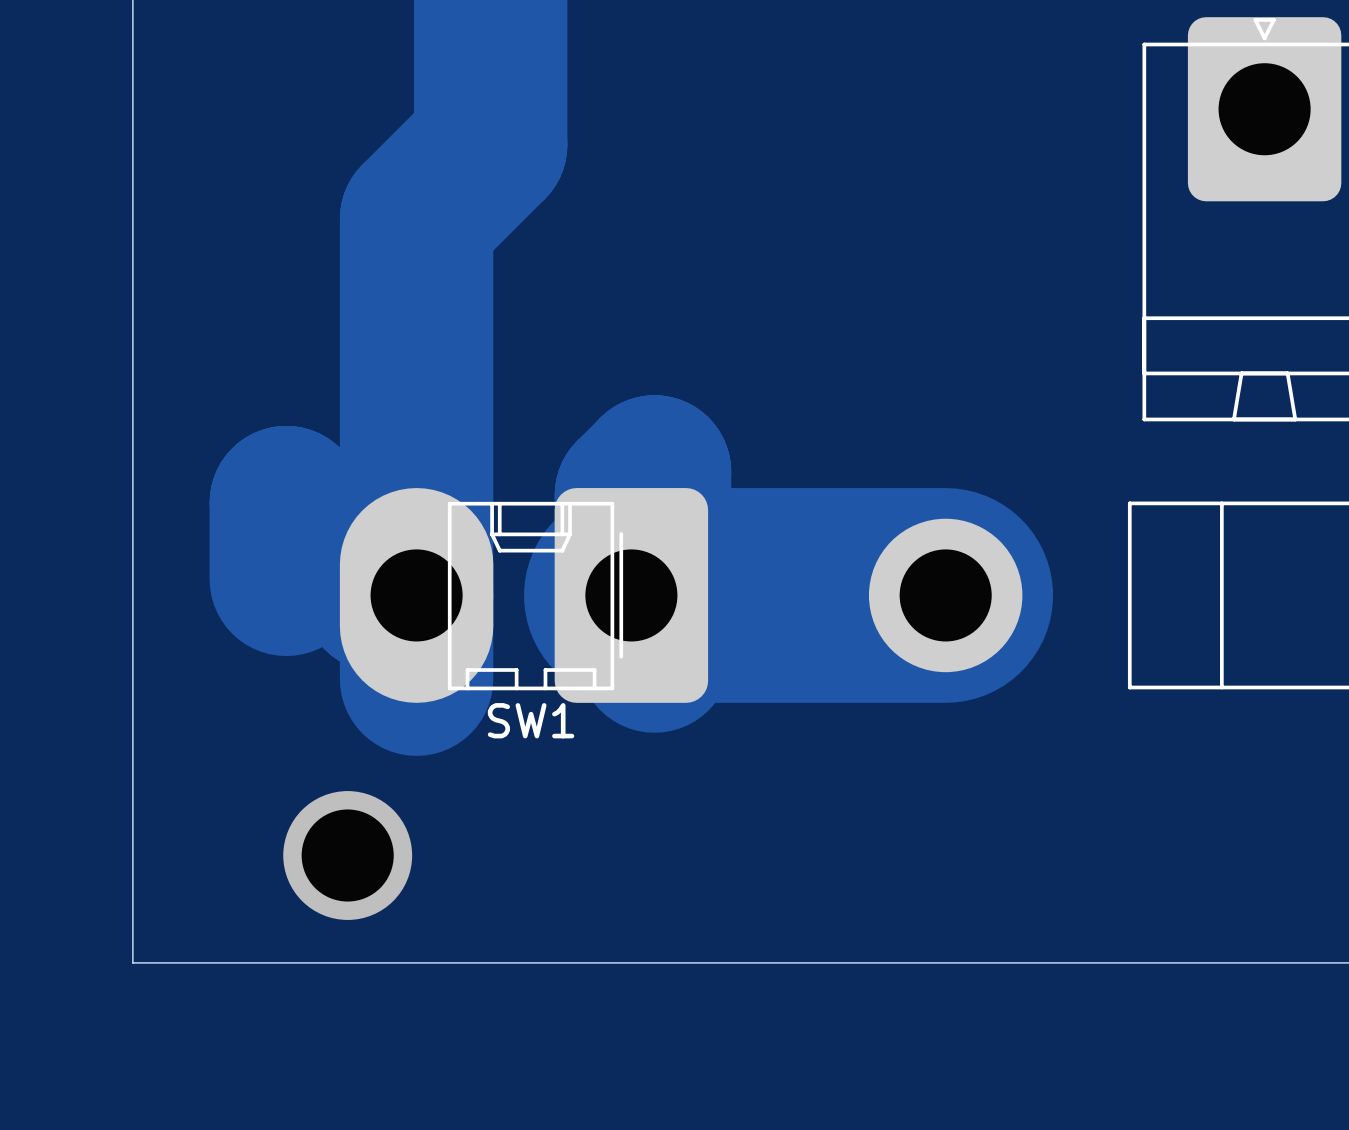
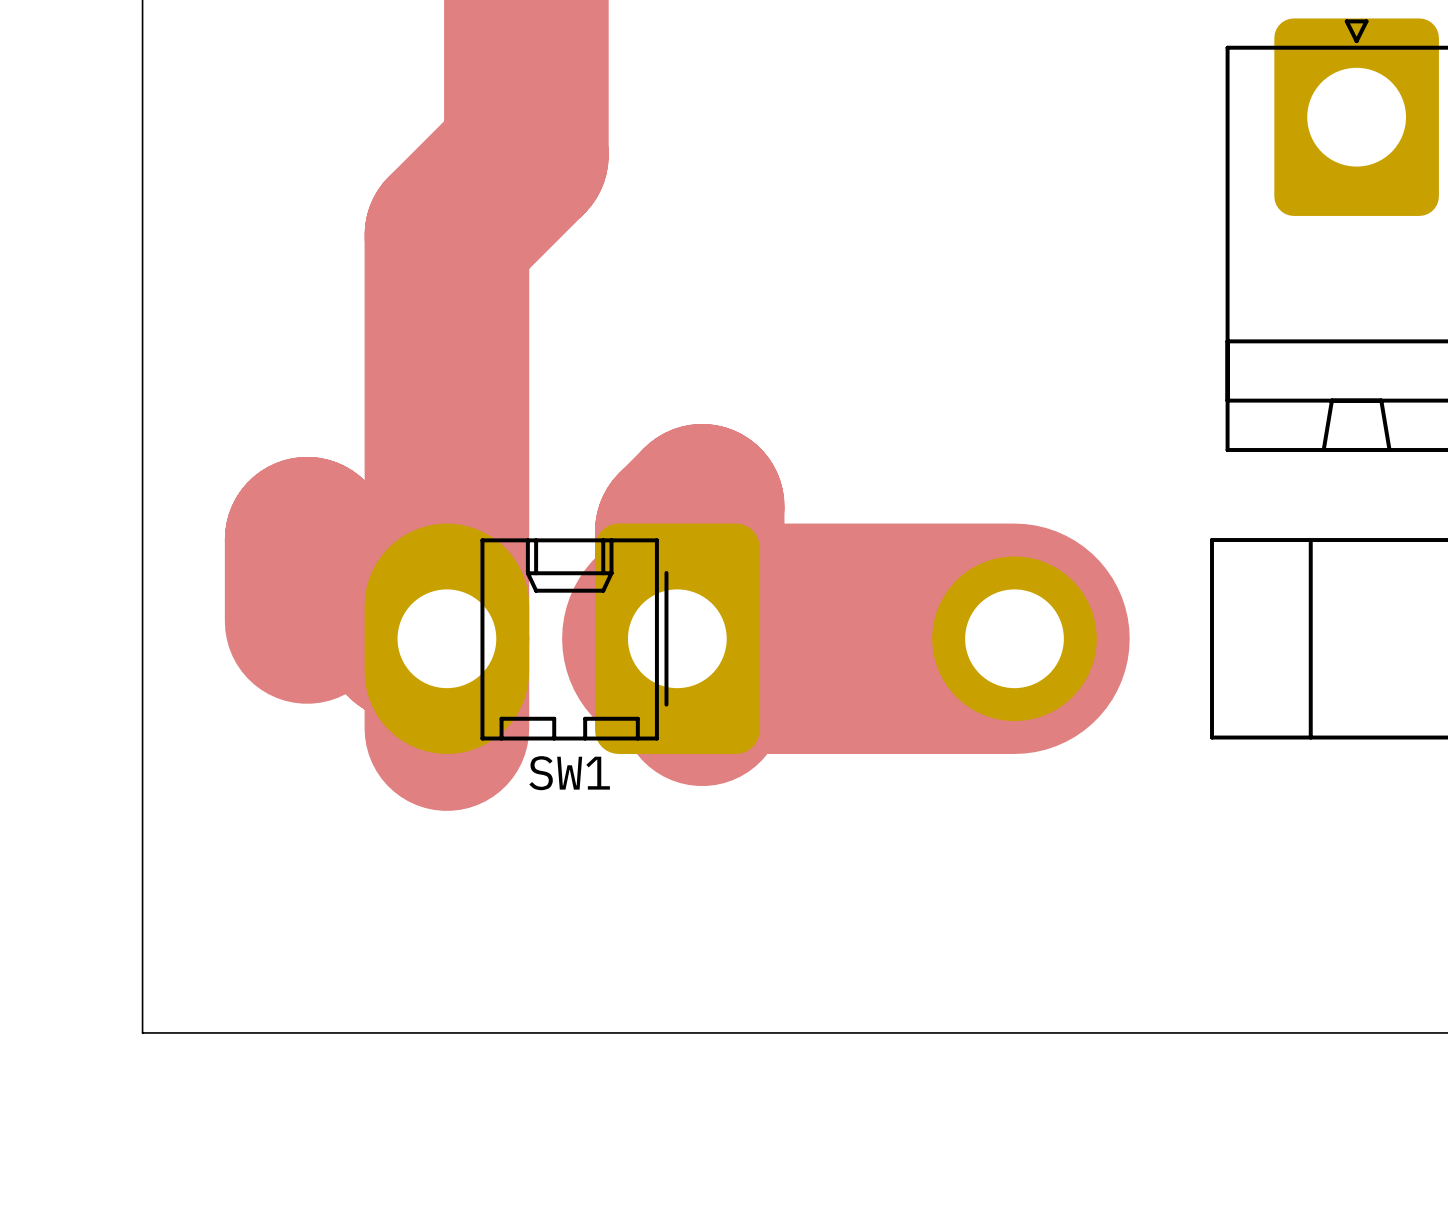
via: (347, 855) -> none

